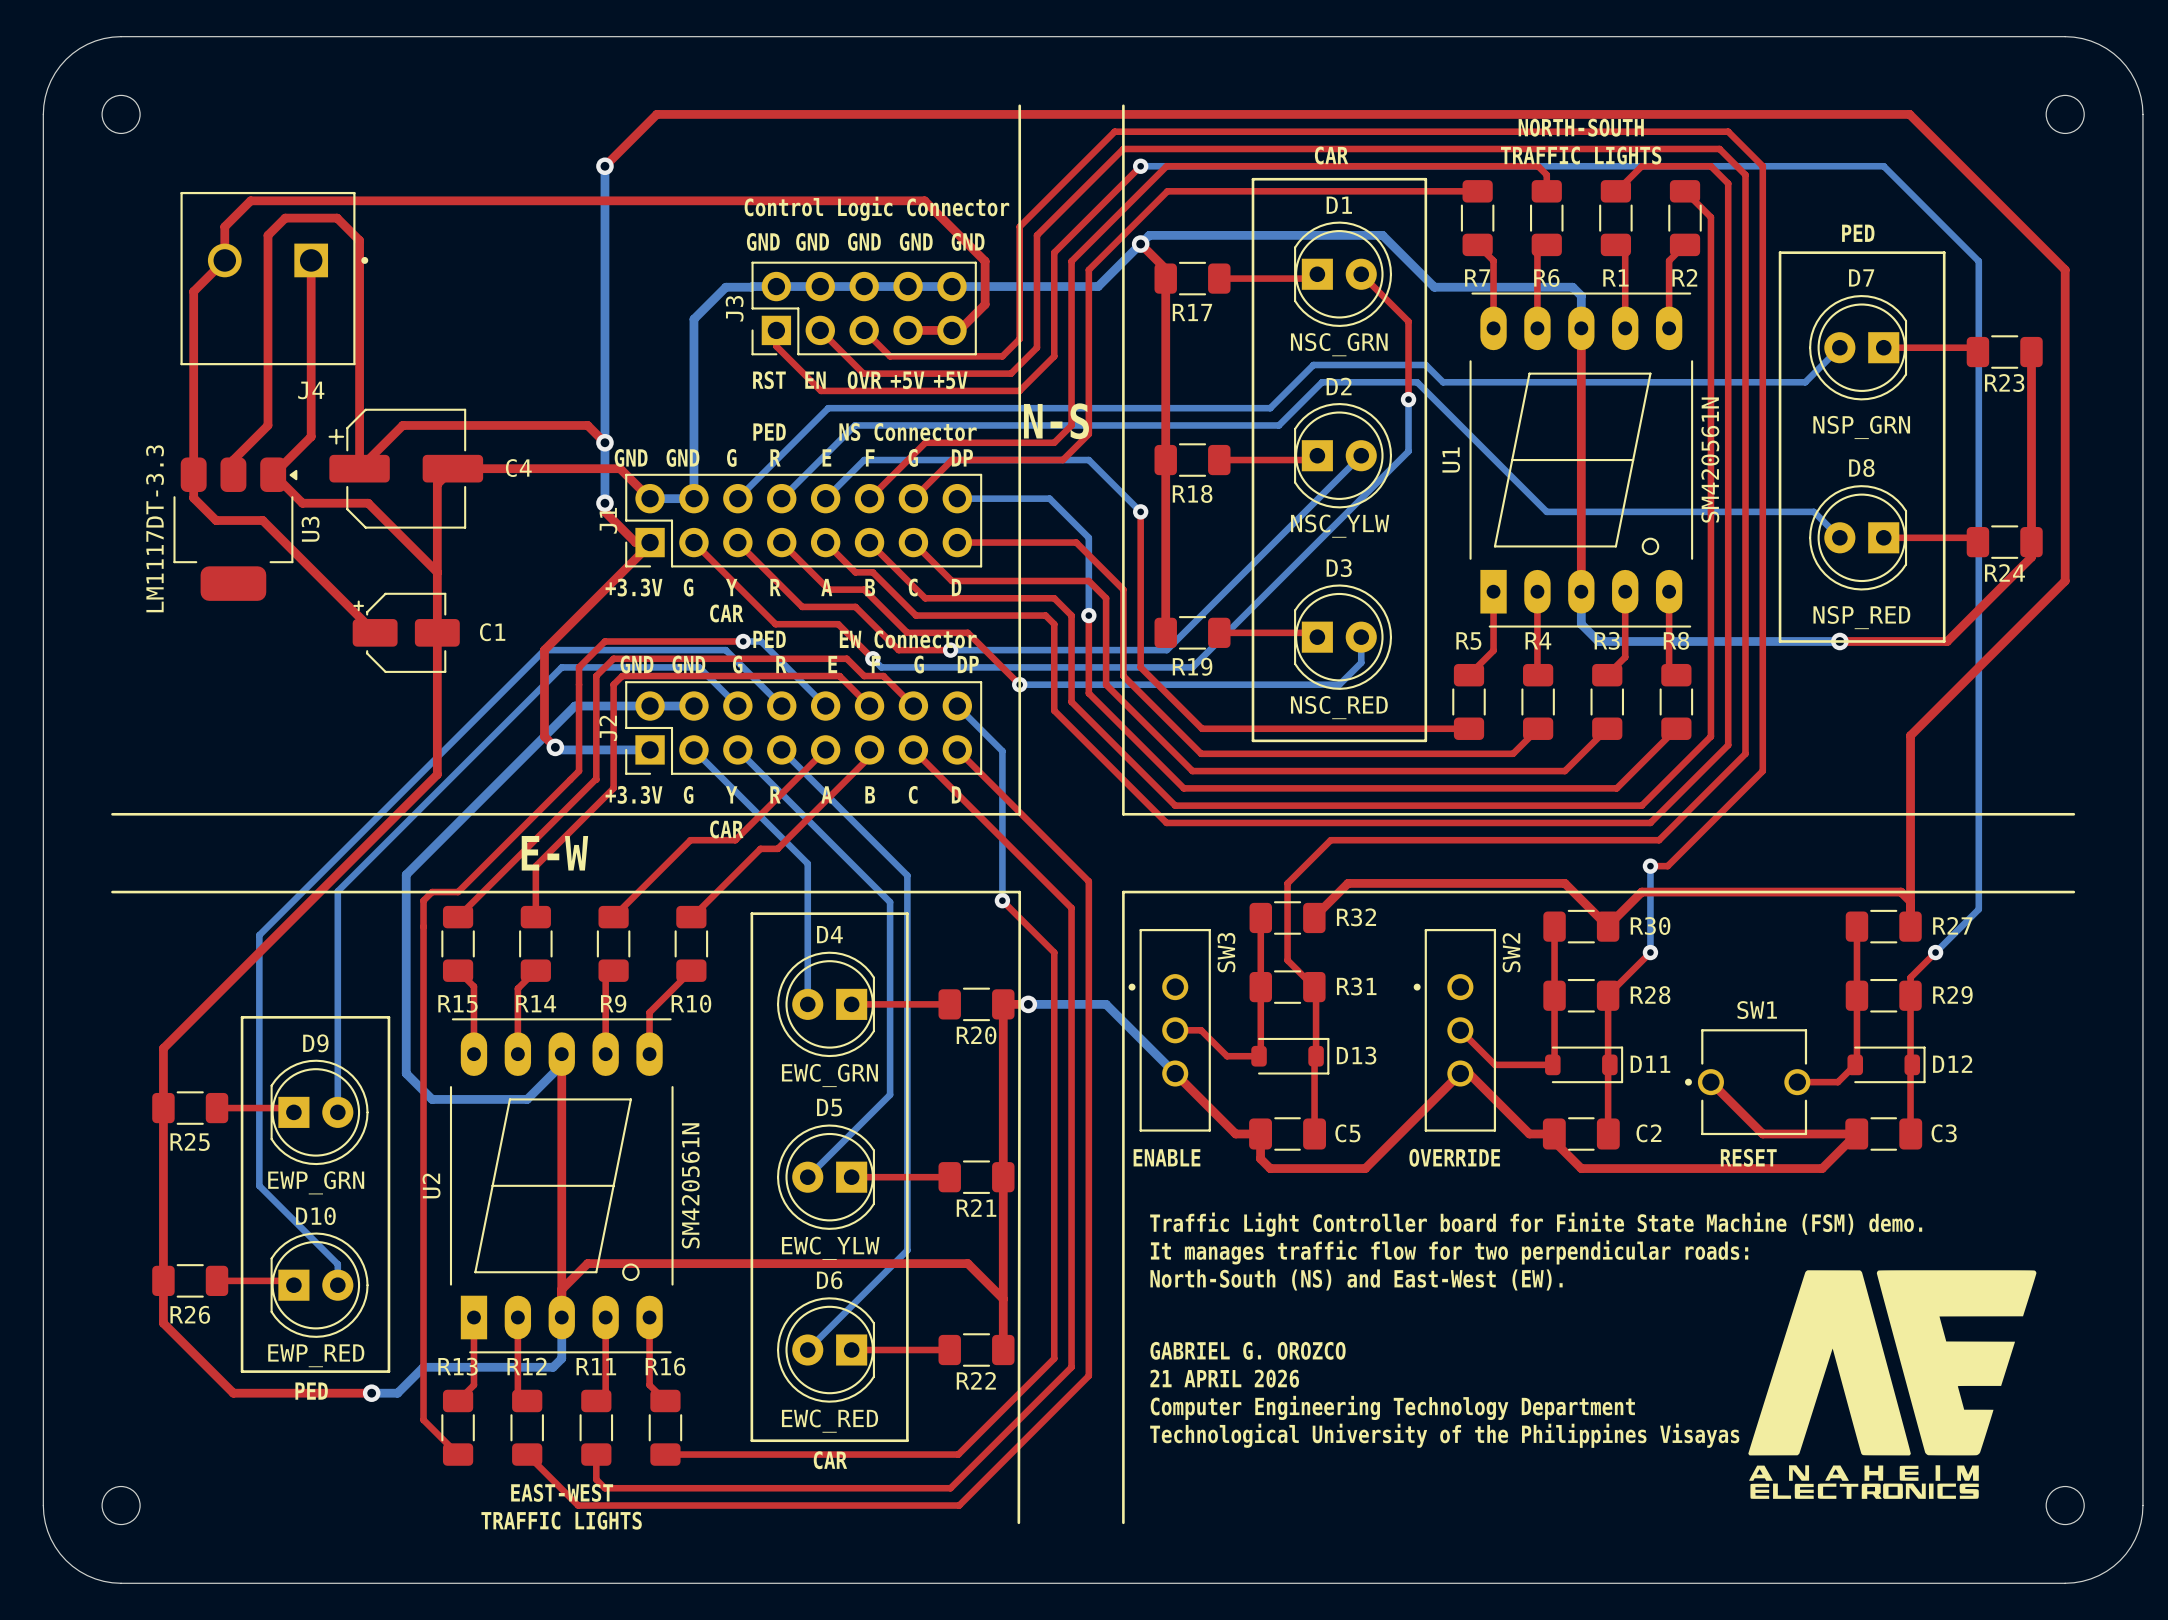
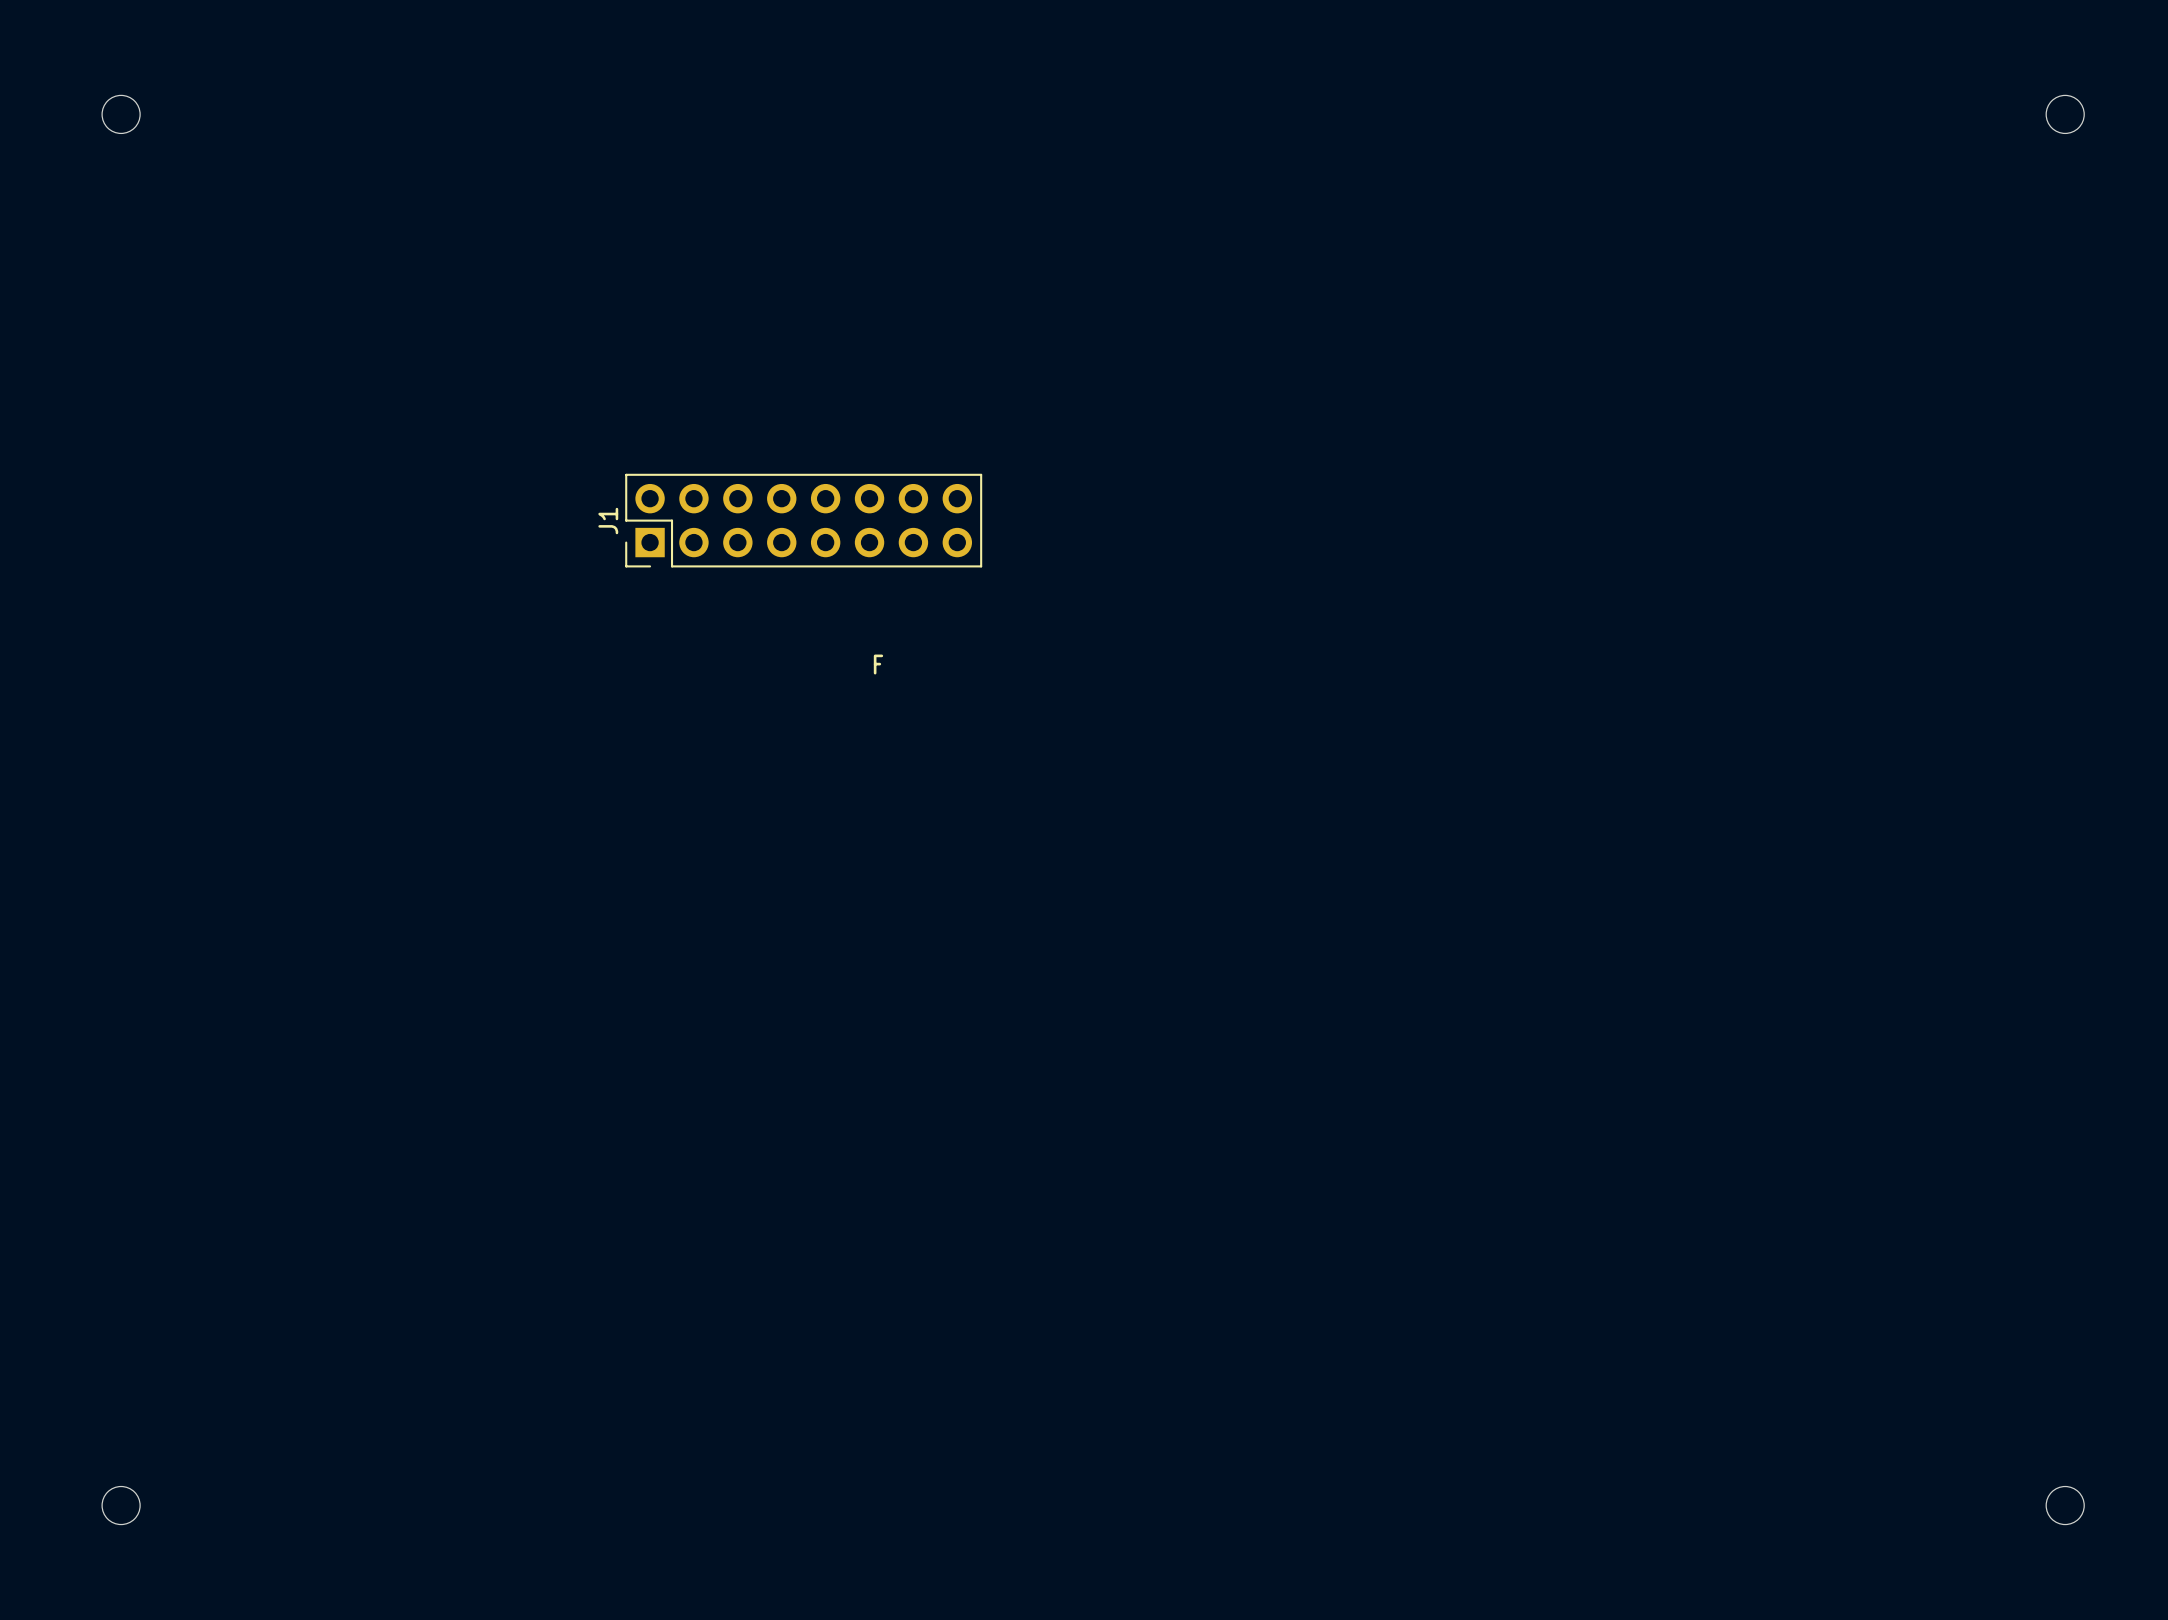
board edge: (121, 36) (2065, 36) (2090, 41) (2113, 53) (2125, 65) (2135, 80) (2141, 97) (2142, 114) (2142, 1505) (2138, 1531) (2125, 1554) (2113, 1566) (2098, 1575) (2082, 1581) (2065, 1583) (121, 1583) (95, 1578) (72, 1566) (60, 1554) (51, 1539) (45, 1522) (43, 1505) (43, 114) (47, 88) (55, 73) (66, 59) (87, 44) (103, 38) (121, 36) -> none
line: (1019, 105) (1019, 814) (112, 814) -> none
line: (1123, 105) (1123, 814) (2073, 814) -> none
text: NORTH-SOUTH (1581, 127) -> none
text: CAR (1331, 155) -> none
text: TRAFFIC LIGHTS (1581, 155) -> none
top track: (604, 166) (656, 114) (1909, 114) (2065, 269) (2065, 581) (1910, 735) (1910, 926) -> none
bottom track: (604, 166) (604, 503) -> none
via: (604, 166) -> none
top track: (1140, 166) (1054, 252) (1054, 356) (1019, 390) (820, 390) (776, 346) (776, 330) -> none
bottom track: (1140, 166) (1883, 166) (1978, 261) (1978, 909) (1935, 952) -> none
via: (1140, 166) -> none
line: (1252, 179) (1425, 179) (1425, 740) (1252, 740) (1252, 179) -> none
top track: (1477, 191) (1167, 191) (1088, 269) (1088, 434) (1062, 460) (952, 460) (913, 498) -> none
top track: (1546, 191) (1546, 174) (1538, 166) (1166, 166) (1071, 261) (1071, 425) (1054, 442) (925, 442) (869, 498) -> none
top track: (1615, 191) (1641, 166) (1710, 166) (1728, 183) (1728, 745) (1650, 822) (1166, 822) (1054, 710) (1054, 624) (1045, 615) (916, 615) (872, 572) (855, 572) (825, 542) (829, 542) -> none
top track: (1685, 191) (1710, 217) (1710, 736) (1641, 805) (1175, 805) (1071, 701) (1071, 615) (1054, 598) (925, 598) (869, 542) -> none
text: Control Logic Connector (876, 208) -> none
R7: (1477, 218) -> none
R6: (1546, 218) -> none
R1: (1615, 218) -> none
R2: (1685, 218) -> none
text: PED (1858, 233) -> none
text: GND (763, 241) -> none
text: GND (812, 241) -> none
text: GND (864, 241) -> none
text: GND (916, 241) -> none
text: GND (968, 241) -> none
top track: (1140, 244) (1165, 269) (1165, 632) -> none
via: (1140, 244) -> none
top track: (1477, 244) (1493, 260) (1493, 328) -> none
top track: (1546, 244) (1537, 254) (1537, 328) -> none
top track: (1615, 244) (1625, 254) (1625, 328) -> none
top track: (1685, 244) (1669, 260) (1669, 328) -> none
line: (1780, 252) (1944, 252) (1944, 641) (1780, 641) (1780, 252) -> none
top track: (311, 260) (311, 436) (273, 474) (302, 503) (368, 503) (437, 572) -> none
top track: (1317, 274) (1313, 278) (1219, 278) -> none
D1: NSC_GRN (1343, 274) -> none
top track: (1361, 274) (1408, 321) (1408, 399) -> none
J4: (274, 278) -> none
R17: (1192, 278) -> none
J3: (864, 308) -> none
top track: (1581, 328) (1581, 591) -> none
bottom track: (1581, 328) (1581, 295) (1572, 287) (1434, 287) (1382, 235) (1149, 235) (1098, 286) (725, 287) (693, 319) (693, 498) (650, 498) -> none
top track: (820, 330) (863, 373) (1011, 373) (1036, 347) (1036, 235) (1123, 148) (1719, 148) (1745, 174) (1745, 753) (1659, 840) (1330, 840) (1287, 883) (1287, 960) (1316, 988) (1314, 1133) -> none
top track: (864, 330) (890, 356) (1002, 356) (1019, 339) (1019, 226) (1114, 131) (1728, 131) (1762, 166) (1762, 771) (1667, 866) (1650, 866) -> none
top track: (908, 330) (959, 330) (985, 304) (985, 261) (924, 200) (250, 200) (224, 226) (224, 260) (193, 291) (193, 498) (216, 520) (262, 520) (375, 632) -> none
bottom track: (1839, 347) (1805, 382) (1443, 382) (1425, 364) (1313, 364) (1270, 408) (828, 408) (737, 498) -> none
D7: NSP_GRN (1858, 347) -> none
top track: (1883, 347) (1973, 347) (1977, 352) -> none
R23: (2004, 352) -> none
top track: (2031, 352) (2031, 557) (1947, 641) (1839, 641) -> none
text: RST (769, 380) -> none
text: EN (815, 380) -> none
text: OVR (864, 380) -> none
text: +5V (907, 380) -> none
text: +5V (950, 380) -> none
bottom track: (1408, 399) (1408, 451) (1192, 667) (881, 667) (872, 658) -> none
via: (1408, 399) -> none
text: N-S (1056, 421) -> none
text: PED (769, 432) -> none
text: NS Connector (908, 432) -> none
top track: (604, 442) (587, 425) (402, 425) (359, 468) (359, 240) (337, 218) (285, 218) (267, 235) (267, 425) (233, 460) (233, 474) -> none
via: (604, 442) -> none
top track: (1317, 455) (1313, 460) (1219, 460) -> none
D2: NSC_YLW (1343, 455) -> none
bottom track: (1361, 455) (1166, 650) (950, 650) -> none
text: GND (631, 457) -> none
text: GND (682, 457) -> none
text: G (731, 457) -> none
text: R (775, 457) -> none
text: E (826, 457) -> none
text: F (870, 457) -> none
text: G (913, 457) -> none
text: DP (962, 457) -> none
R18: (1192, 460) -> none
U1: SM420561N (1581, 460) -> none
C4: (405, 468) -> none
top track: (650, 498) (620, 468) (452, 468) (437, 484) (437, 774) (163, 1048) (163, 1323) (233, 1393) (371, 1393) -> none
bottom track: (781, 498) (854, 425) (1278, 425) (1322, 382) (1417, 382) (1546, 511) (1813, 511) (1839, 537) -> none
bottom track: (825, 498) (864, 460) (1088, 460) (1140, 511) -> none
bottom track: (957, 498) (1049, 498) (1088, 537) (1088, 615) -> none
top track: (604, 503) (604, 511) (635, 542) (650, 542) (650, 544) (544, 650) (544, 736) (555, 747) -> none
via: (604, 503) -> none
top track: (1140, 511) (1140, 667) (1202, 728) (1469, 728) -> none
via: (1140, 511) -> none
U3: LM1117DT-3.3 (235, 529) -> none
D8: NSP_RED (1858, 537) -> none
top track: (1883, 537) (1973, 537) (1977, 542) -> none
top track: (693, 542) (775, 624) (838, 624) (872, 658) -> none
top track: (737, 542) (802, 606) (855, 606) (898, 650) (950, 650) -> none
top track: (781, 542) (828, 589) (864, 589) (907, 632) (967, 632) (1019, 684) -> none
top track: (913, 542) (951, 581) (1088, 581) (1106, 598) (1106, 684) (1192, 771) (1564, 771) (1607, 728) -> none
top track: (957, 542) (1076, 542) (1123, 589) (1123, 676) (1201, 753) (1513, 753) (1538, 728) -> none
R24: (2004, 542) -> none
text: +3.3V (634, 587) -> none
text: G (688, 587) -> none
text: Y (731, 587) -> none
text: R (775, 587) -> none
text: A (826, 587) -> none
text: B (870, 587) -> none
text: C (913, 587) -> none
text: D (956, 587) -> none
top track: (1493, 591) (1493, 650) (1469, 675) -> none
top track: (1537, 591) (1538, 675) -> none
bottom track: (1581, 591) (1581, 624) (1598, 641) (1839, 641) -> none
top track: (1625, 591) (1625, 657) (1607, 675) -> none
top track: (1669, 591) (1669, 667) (1676, 675) -> none
text: CAR (726, 613) -> none
top track: (1088, 615) (1088, 693) (1183, 788) (1616, 788) (1676, 728) -> none
via: (1088, 615) -> none
C1: (406, 632) -> none
R19: (1192, 632) -> none
top track: (1219, 632) (1313, 632) (1317, 637) -> none
D3: NSC_RED (1343, 637) -> none
bottom track: (1361, 637) (1361, 662) (1339, 684) (1019, 684) -> none
text: PED (769, 639) -> none
text: EW Connector (908, 639) -> none
top track: (743, 641) (604, 641) (579, 667) (579, 771) (458, 892) (432, 892) (423, 900) (423, 1419) (458, 1454) -> none
bottom track: (743, 641) (761, 641) (825, 706) -> none
via: (743, 641) -> none
via: (1839, 641) -> none
via: (950, 650) -> none
via: (872, 658) -> none
text: GND (636, 664) -> none
text: GND (688, 664) -> none
text: G (737, 664) -> none
text: R (781, 664) -> none
text: E (832, 664) -> none
text: G (919, 664) -> none
text: DP (968, 664) -> none
via: (1019, 684) -> none
R5: (1469, 701) -> none
R4: (1538, 701) -> none
R3: (1607, 701) -> none
R8: (1676, 701) -> none
bottom track: (693, 706) (574, 706) (406, 874) (406, 1073) (432, 1099) (527, 1099) (561, 1064) (561, 1054) -> none
bottom track: (737, 706) (699, 667) (561, 667) (337, 891) (337, 1112) -> none
bottom track: (781, 706) (725, 650) (544, 650) (259, 935) (259, 1185) (337, 1264) (337, 1285) -> none
top track: (869, 706) (839, 676) (622, 676) (613, 684) (613, 788) (535, 866) (535, 917) -> none
top track: (913, 706) (883, 676) (864, 676) (846, 658) (613, 658) (596, 676) (596, 779) (458, 917) -> none
bottom track: (957, 706) (1002, 751) (1002, 900) -> none
J2: (803, 727) -> none
bottom track: (555, 747) (557, 749) (650, 749) -> none
via: (555, 747) -> none
bottom track: (693, 749) (807, 863) (807, 1004) -> none
bottom track: (737, 749) (890, 902) (890, 1094) (807, 1177) -> none
bottom track: (781, 749) (907, 875) (907, 1250) (807, 1350) -> none
top track: (825, 749) (735, 840) (690, 840) (613, 917) -> none
top track: (869, 749) (869, 757) (777, 848) (760, 848) (691, 917) -> none
top track: (913, 749) (1071, 908) (1071, 1367) (950, 1488) (604, 1488) (596, 1479) (596, 1454) -> none
top track: (957, 749) (1088, 881) (1088, 1375) (959, 1505) (578, 1505) (527, 1454) -> none
text: +3.3V (634, 794) -> none
text: G (688, 794) -> none
text: Y (731, 794) -> none
text: R (775, 794) -> none
text: A (826, 794) -> none
text: B (870, 794) -> none
text: C (913, 794) -> none
text: D (956, 794) -> none
text: CAR (726, 829) -> none
text: E-W (554, 853) -> none
bottom track: (1650, 866) (1650, 952) -> none
via: (1650, 866) -> none
line: (112, 892) (1019, 892) (1018, 1522) -> none
line: (2073, 892) (1123, 892) (1123, 1522) -> none
top track: (1002, 900) (1054, 952) (1054, 1358) (958, 1454) (665, 1454) -> none
via: (1002, 900) -> none
top track: (1910, 901) (1901, 892) (1641, 892) (1608, 926) (1564, 883) (1348, 883) (1314, 917) -> none
line: (751, 913) (907, 913) (907, 1440) (751, 1440) (751, 913) -> none
top track: (1260, 917) (1260, 1054) (1259, 1056) (1227, 1056) (1201, 1030) (1175, 1030) -> none
R32: (1287, 917) -> none
top track: (1554, 926) (1554, 1063) (1552, 1064) (1494, 1064) (1460, 1030) -> none
R30: (1581, 926) -> none
top track: (1856, 926) (1856, 1063) (1837, 1082) (1797, 1082) -> none
R27: (1883, 926) -> none
R15: (458, 943) -> none
R14: (535, 943) -> none
R9: (613, 943) -> none
R10: (691, 943) -> none
top track: (1650, 952) (1608, 994) (1608, 1133) -> none
via: (1650, 952) -> none
top track: (1935, 952) (1910, 977) (1910, 1133) -> none
via: (1935, 952) -> none
top track: (458, 970) (473, 986) (473, 1054) -> none
top track: (535, 970) (517, 988) (517, 1054) -> none
top track: (613, 970) (605, 978) (605, 1054) -> none
top track: (691, 970) (649, 1012) (649, 1054) -> none
R31: (1287, 987) -> none
R28: (1581, 995) -> none
R29: (1883, 995) -> none
D4: EWC_GRN (825, 1004) -> none
top track: (851, 1004) (949, 1004) -> none
R20: (976, 1004) -> none
top track: (1028, 1004) (1003, 1004) (1003, 1350) -> none
bottom track: (1028, 1004) (1106, 1004) (1175, 1073) -> none
via: (1028, 1004) -> none
line: (242, 1017) (388, 1017) (388, 1371) (242, 1371) (242, 1017) -> none
SW3: (1169, 1030) -> none
SW2: (1454, 1030) -> none
top track: (561, 1054) (561, 1317) -> none
D13: (1290, 1056) -> none
D11: (1584, 1064) -> none
D12: (1886, 1064) -> none
top track: (1175, 1073) (1235, 1133) (1260, 1133) (1260, 1158) (1270, 1168) (1365, 1168) (1460, 1073) (1469, 1073) (1529, 1133) (1554, 1133) (1554, 1141) (1581, 1168) (1822, 1168) (1856, 1133) (1762, 1133) (1710, 1082) -> none
SW1: (1747, 1082) -> none
R25: (190, 1108) -> none
top track: (217, 1108) (289, 1108) (293, 1112) -> none
D9: EWP_GRN (319, 1112) -> none
C5: (1287, 1133) -> none
C2: (1581, 1133) -> none
C3: (1883, 1133) -> none
text: ENABLE (1166, 1157) -> none
text: OVERRIDE (1454, 1157) -> none
text: RESET (1748, 1157) -> none
D5: EWC_YLW (825, 1177) -> none
top track: (851, 1177) (949, 1177) -> none
R21: (976, 1177) -> none
U2: SM420561N (561, 1185) -> none
text: Traffic Light Controller board for Finite State Machine (FSM) demo. (1536, 1224) -> none
text: It manages traffic flow for two perpendicular roads: (1449, 1252) -> none
drawing: [1748, 1270, 2037, 1499] -> none
text: North-South (NS) and East-West (EW). (1356, 1279) -> none
R26: (190, 1280) -> none
top track: (217, 1280) (289, 1280) (293, 1285) -> none
D10: EWP_RED (319, 1285) -> none
top track: (561, 1289) (587, 1263) (967, 1263) (1003, 1299) -> none
top track: (473, 1317) (473, 1385) (458, 1400) -> none
top track: (517, 1317) (517, 1391) (527, 1400) -> none
bottom track: (561, 1317) (561, 1358) (553, 1367) (423, 1367) (397, 1393) (371, 1393) -> none
top track: (605, 1317) (605, 1391) (596, 1400) -> none
top track: (649, 1317) (649, 1385) (665, 1400) -> none
D6: EWC_RED (825, 1350) -> none
top track: (851, 1350) (949, 1350) -> none
R22: (976, 1350) -> none
text: GABRIEL G. OROZCO (1248, 1350) -> none
text: 21 APRIL 2026 (1224, 1378) -> none
text: PED (311, 1391) -> none
via: (371, 1393) -> none
text: Computer Engineering Technology Department (1392, 1407) -> none
R13: (458, 1427) -> none
R12: (527, 1427) -> none
R11: (596, 1427) -> none
R16: (665, 1427) -> none
text: Technological University of the Philippines Visayas (1444, 1435) -> none
text: CAR (830, 1460) -> none
text: EAST-WEST (562, 1492) -> none
text: TRAFFIC LIGHTS (561, 1520) -> none

